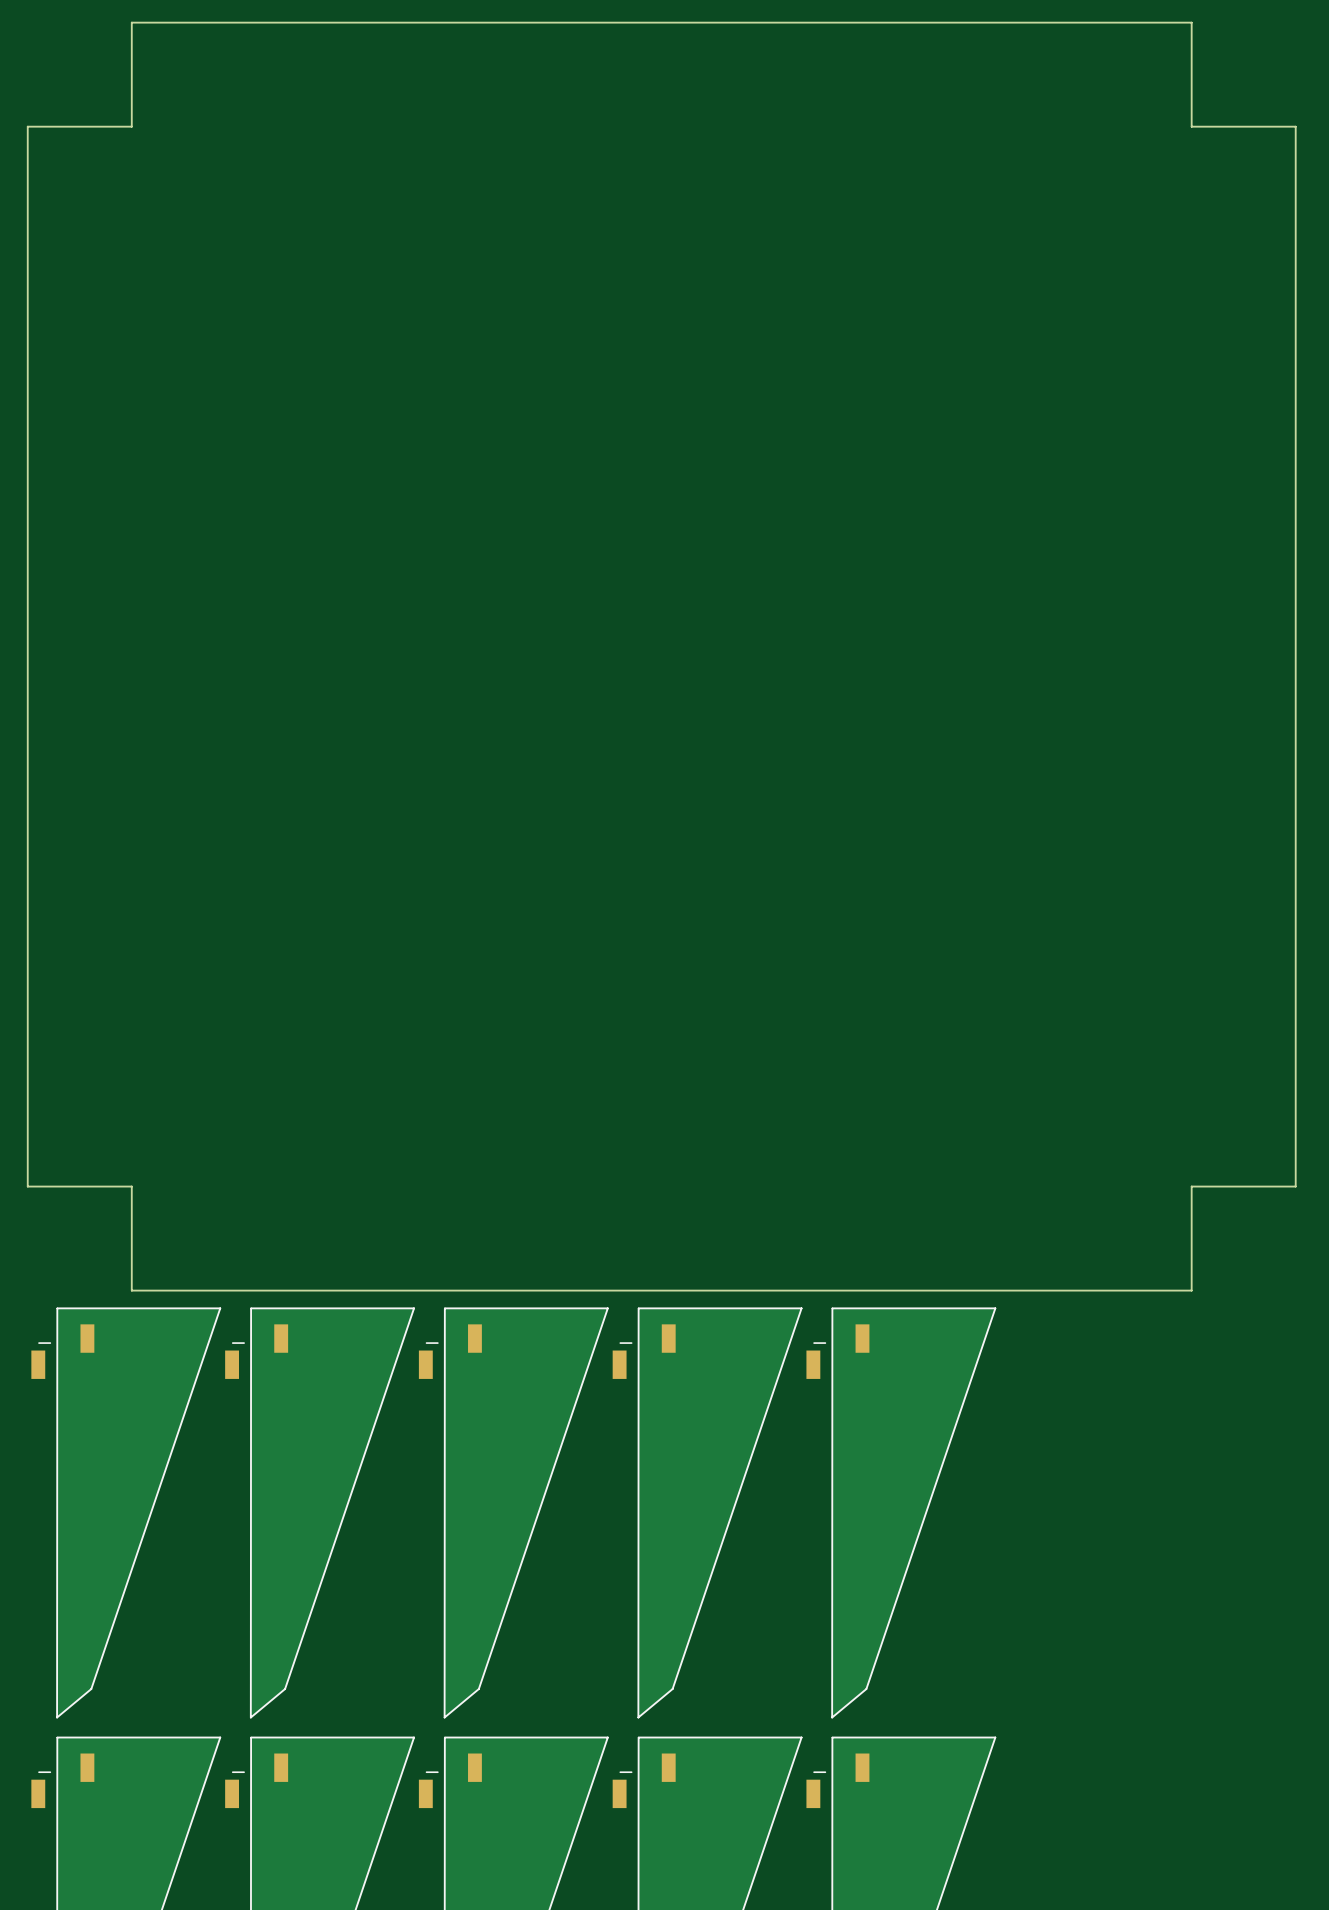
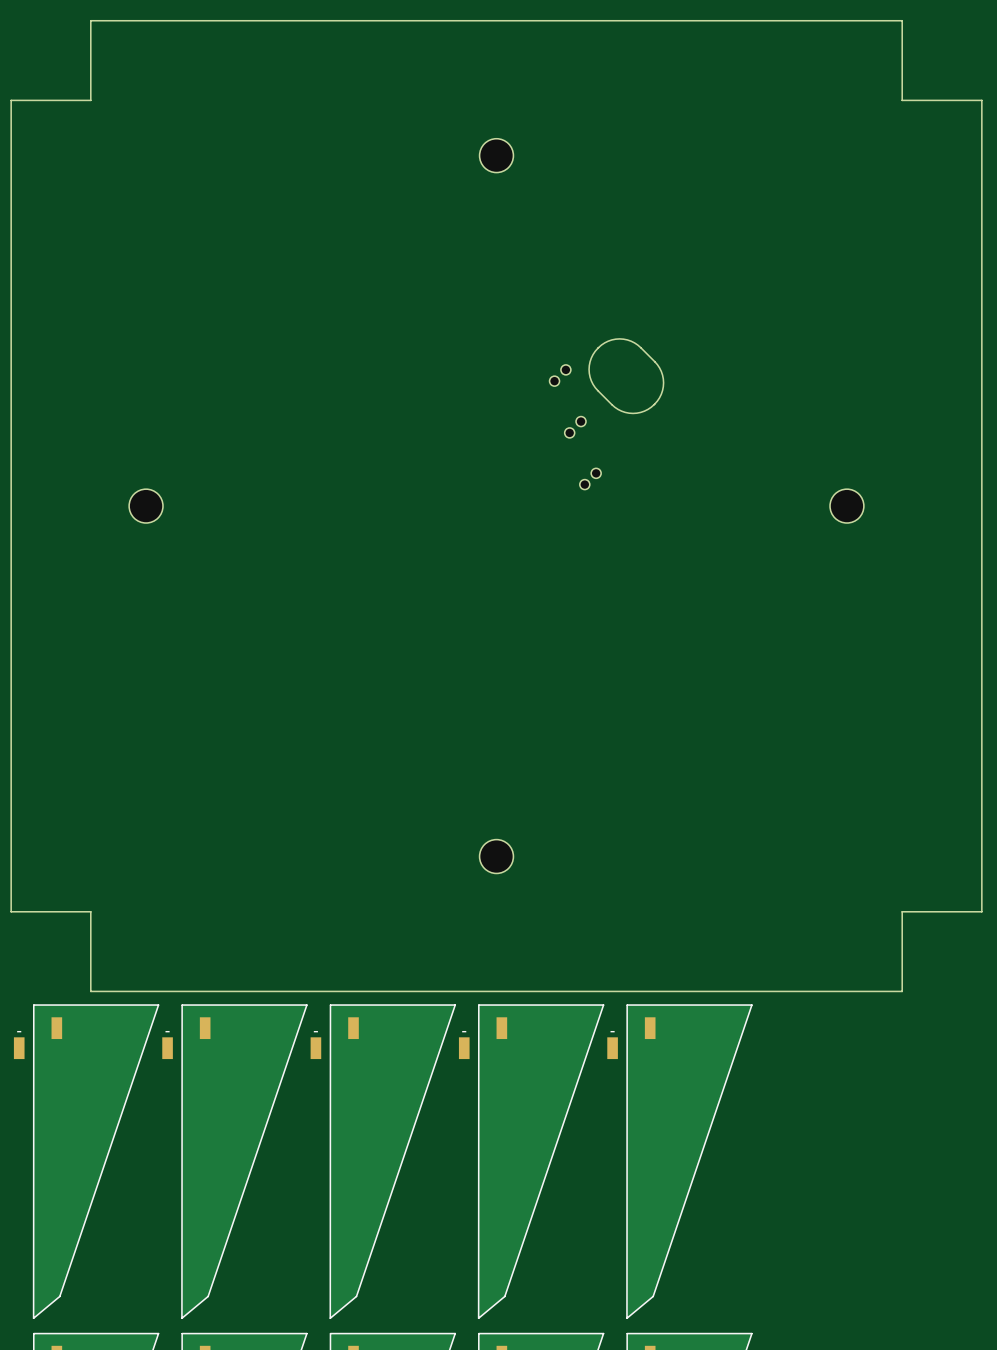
hole: none -> (496, 155)
board edge: none -> (598, 347) (591, 358) (589, 369) (591, 380) (597, 390) (614, 407) (625, 412) (640, 412) (654, 404) (661, 394) (663, 382) (661, 371) (654, 361) (637, 345) (627, 339) (611, 339) (598, 347)
hole: none -> (565, 369)
hole: none -> (554, 381)
hole: none -> (581, 421)
hole: none -> (569, 432)
hole: none -> (596, 473)
hole: none -> (584, 484)
hole: none -> (146, 506)
hole: none -> (846, 506)
hole: none -> (496, 856)

